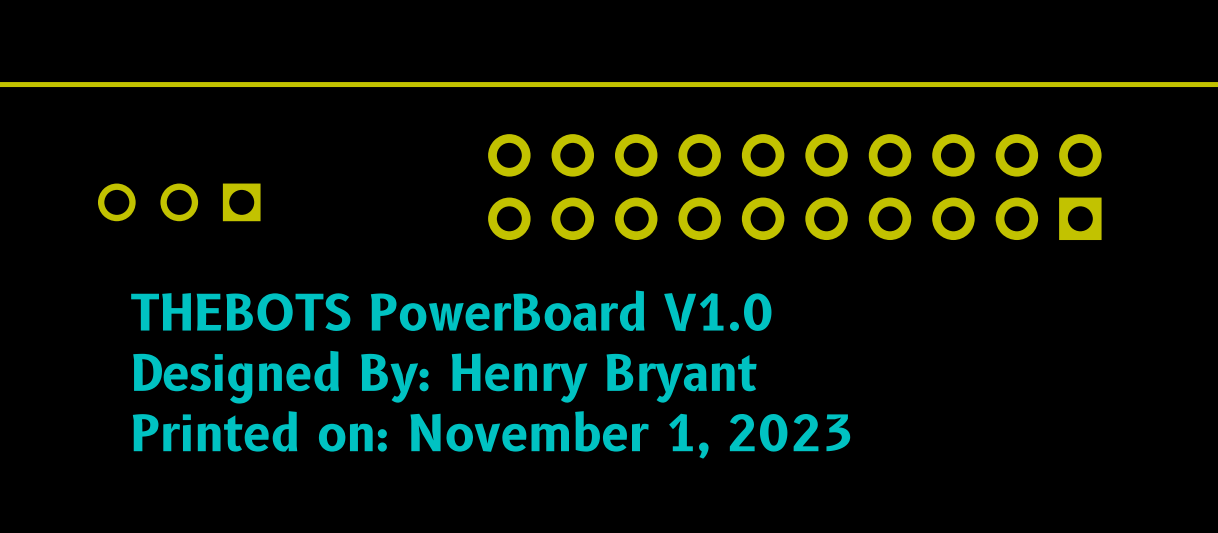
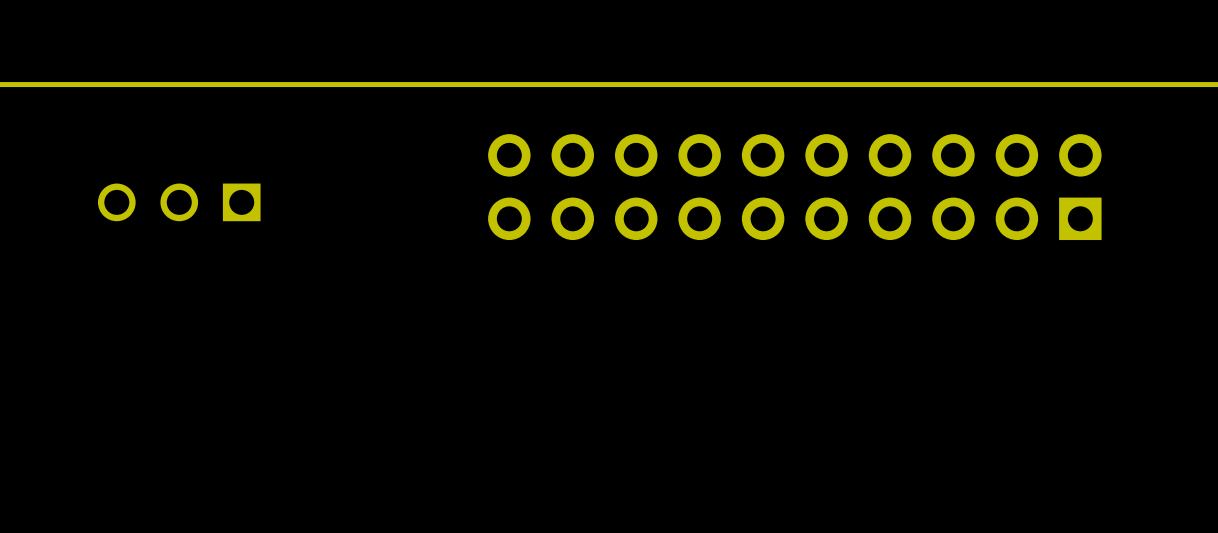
text: THEBOTS PowerBoard V1.0 (451, 310) -> none
text: Designed By: Henry Bryant (444, 377) -> none
text: Printed on: November 1, 2023 (491, 434) -> none

